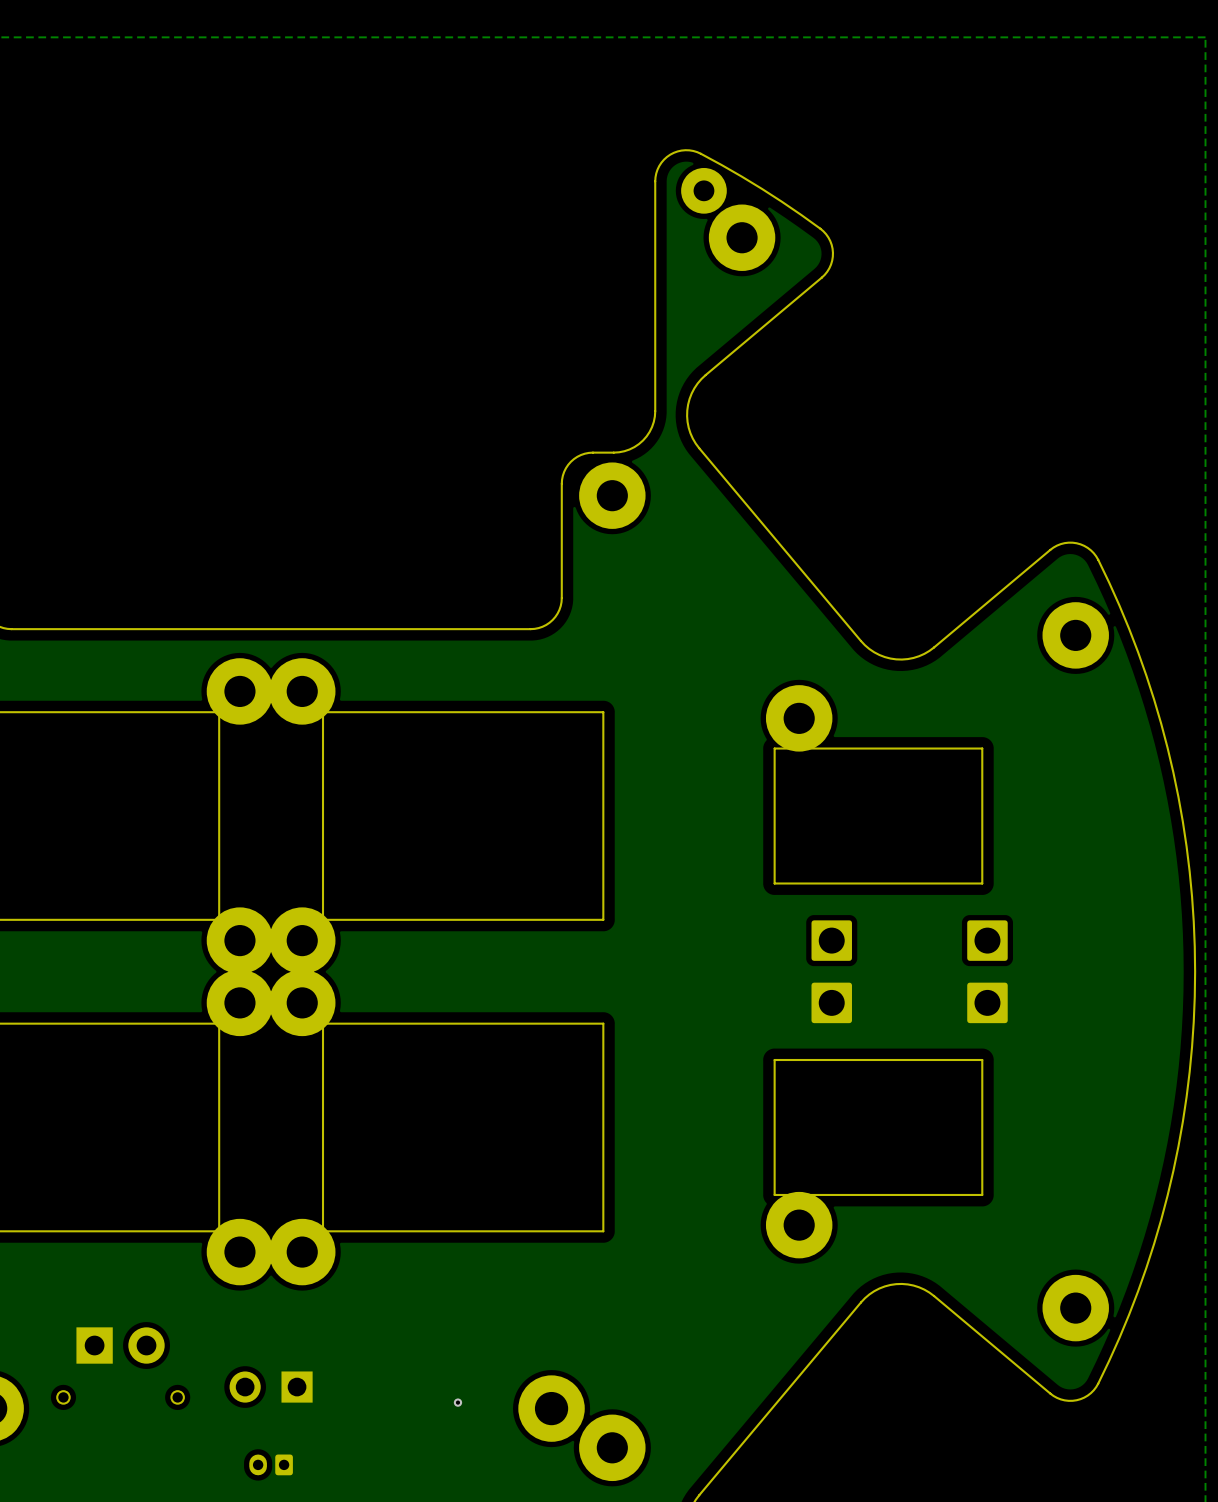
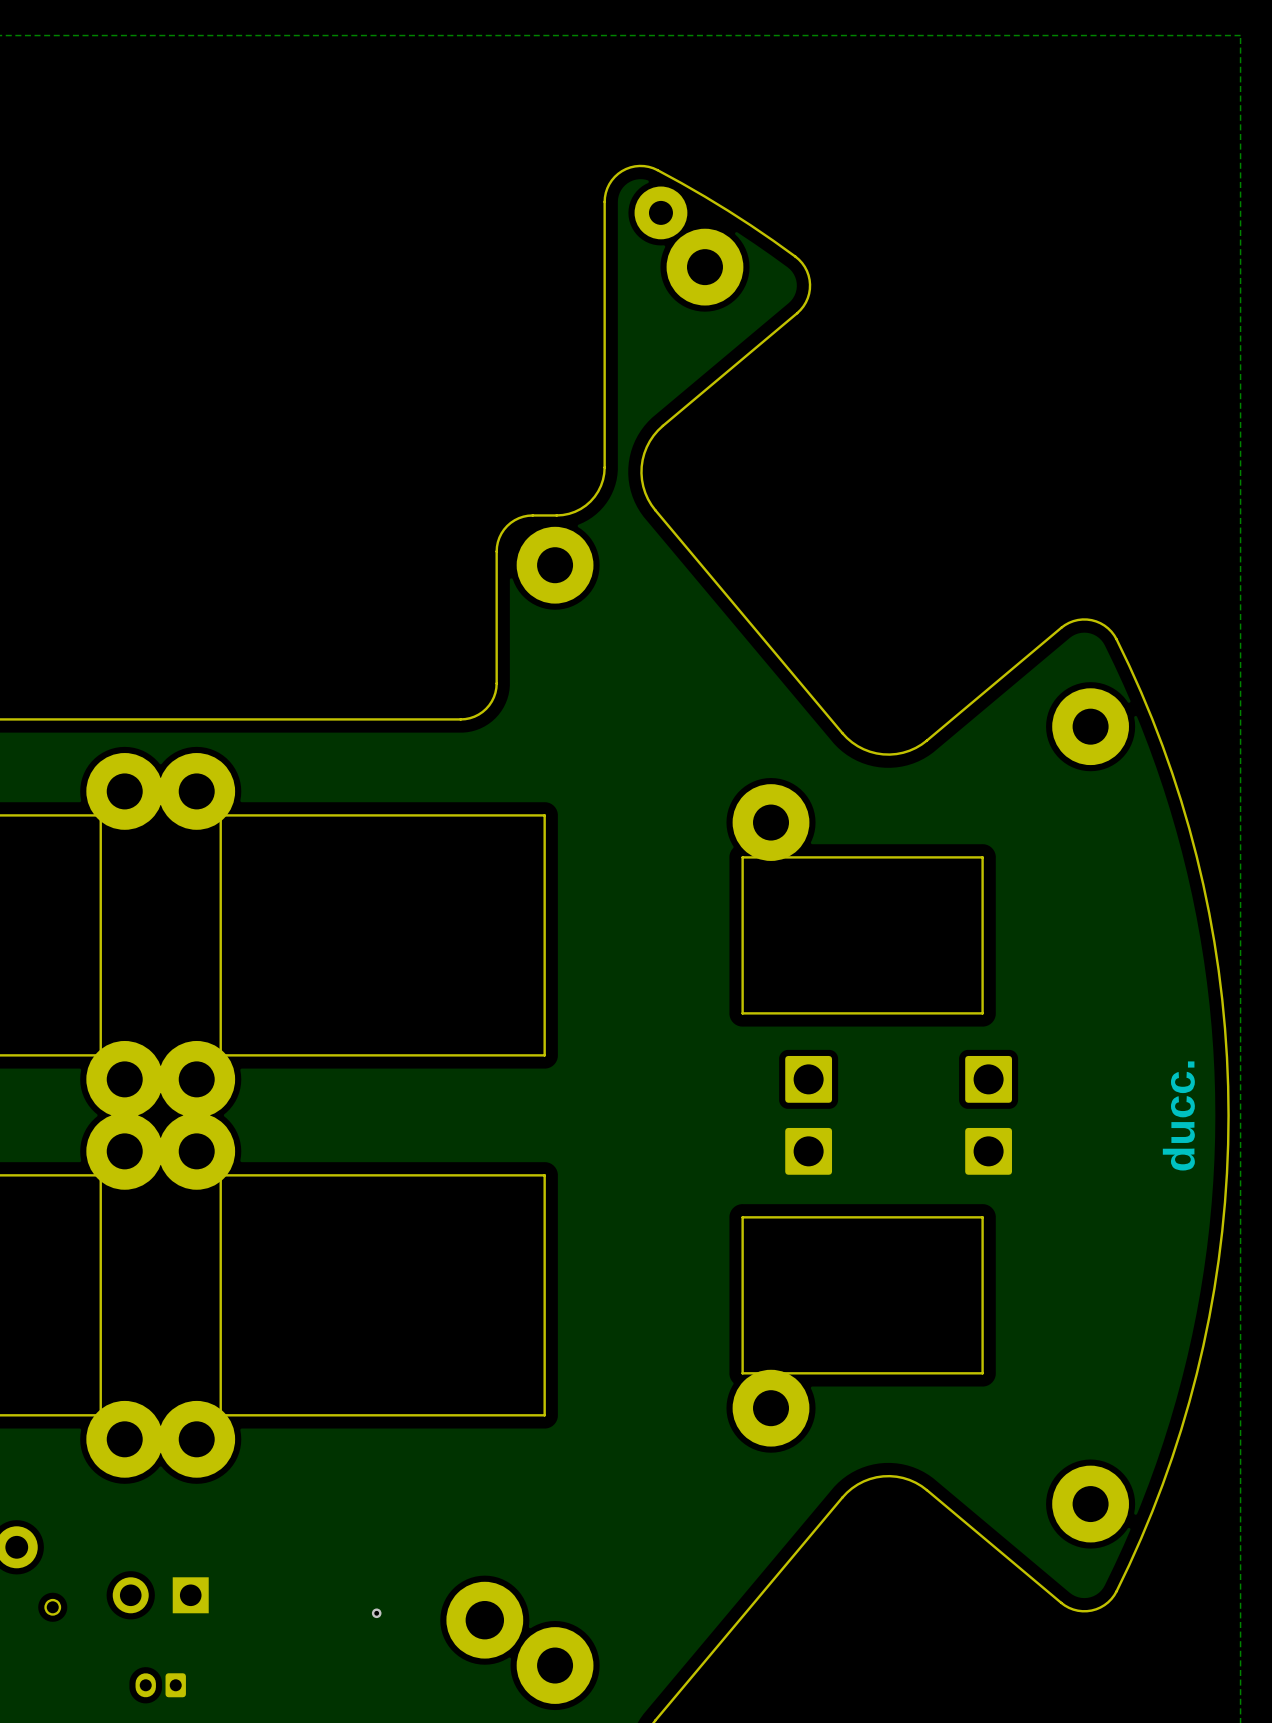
text: none -> ducc. (1178, 1115)

